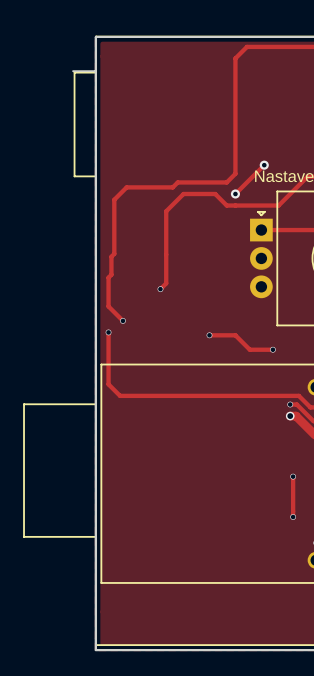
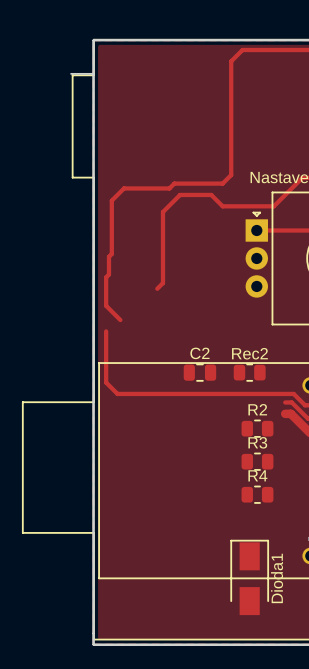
track: (264, 165) (235, 194) -> none
via: (264, 165) -> none
via: (235, 194) -> none
via: (160, 289) -> none
via: (122, 320) -> none
via: (108, 332) -> none
track: (209, 335) (235, 335) (249, 349) (272, 349) -> none
via: (209, 335) -> none
via: (272, 349) -> none
C2: none -> (199, 372)
Rec2: none -> (249, 372)
via: (290, 404) -> none
via: (290, 416) -> none
R2: none -> (257, 428)
R3: none -> (257, 461)
track: (293, 476) (293, 517) -> none
via: (293, 476) -> none
R4: none -> (257, 494)
via: (293, 517) -> none
Dioda1: none -> (249, 577)

